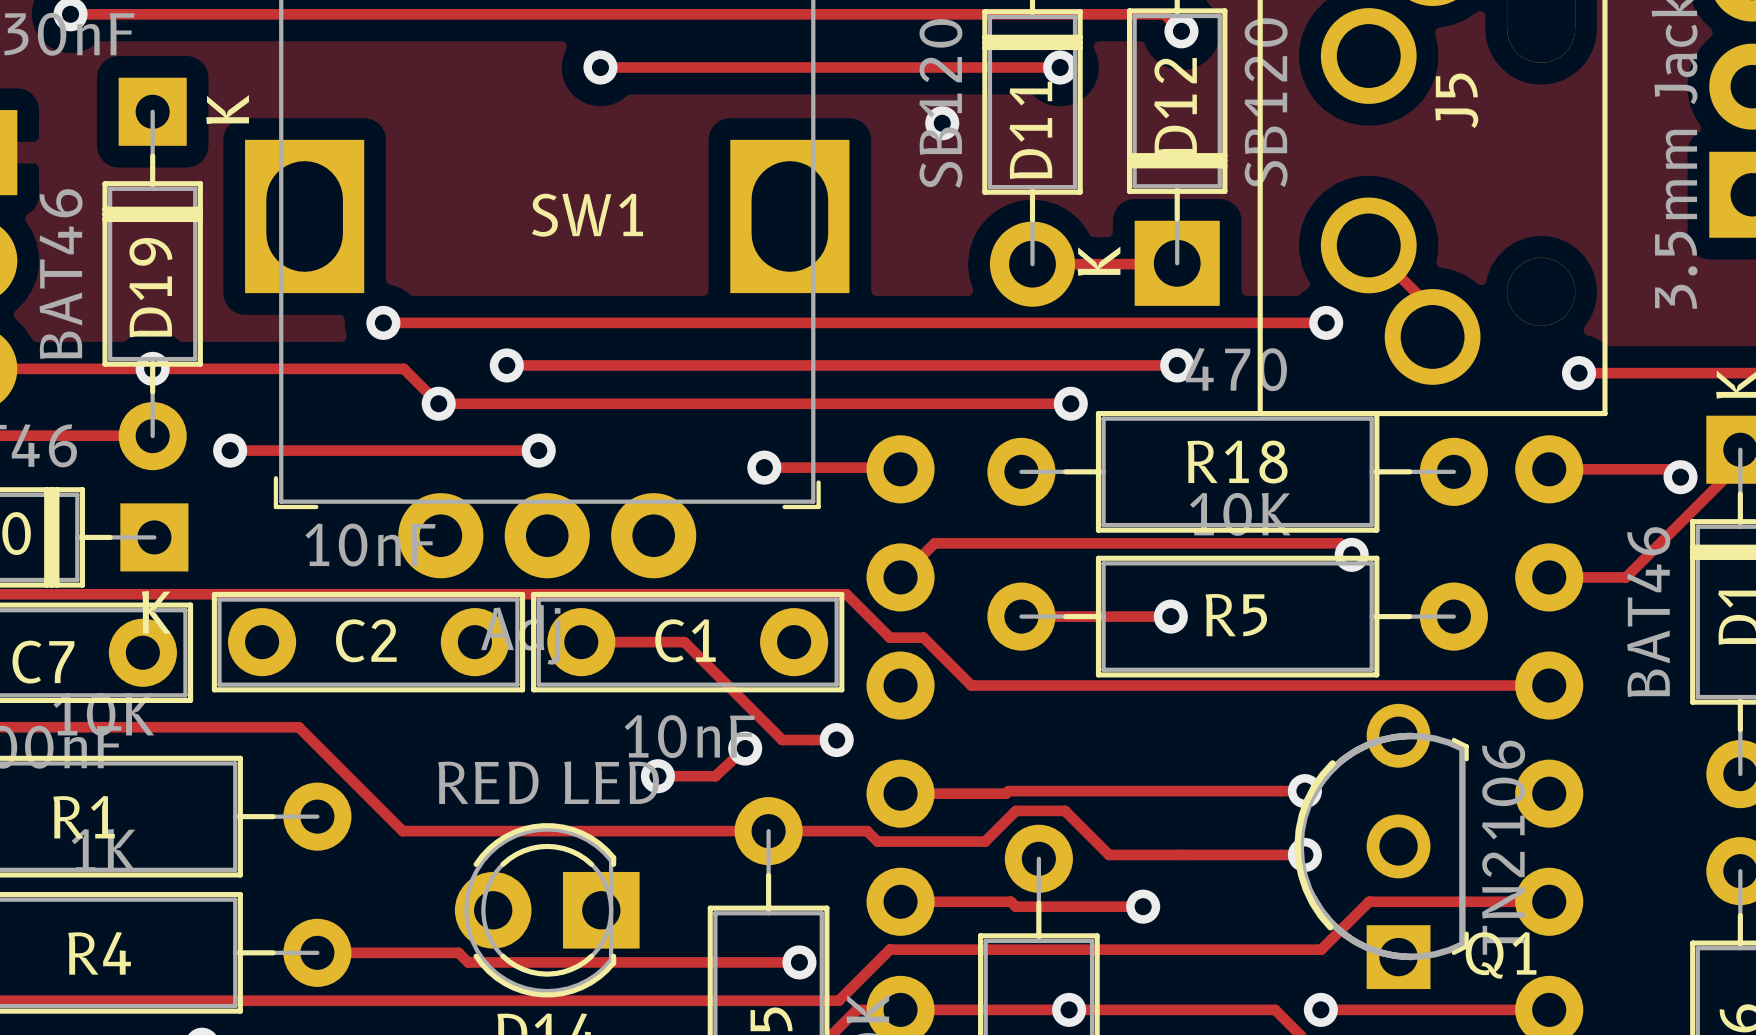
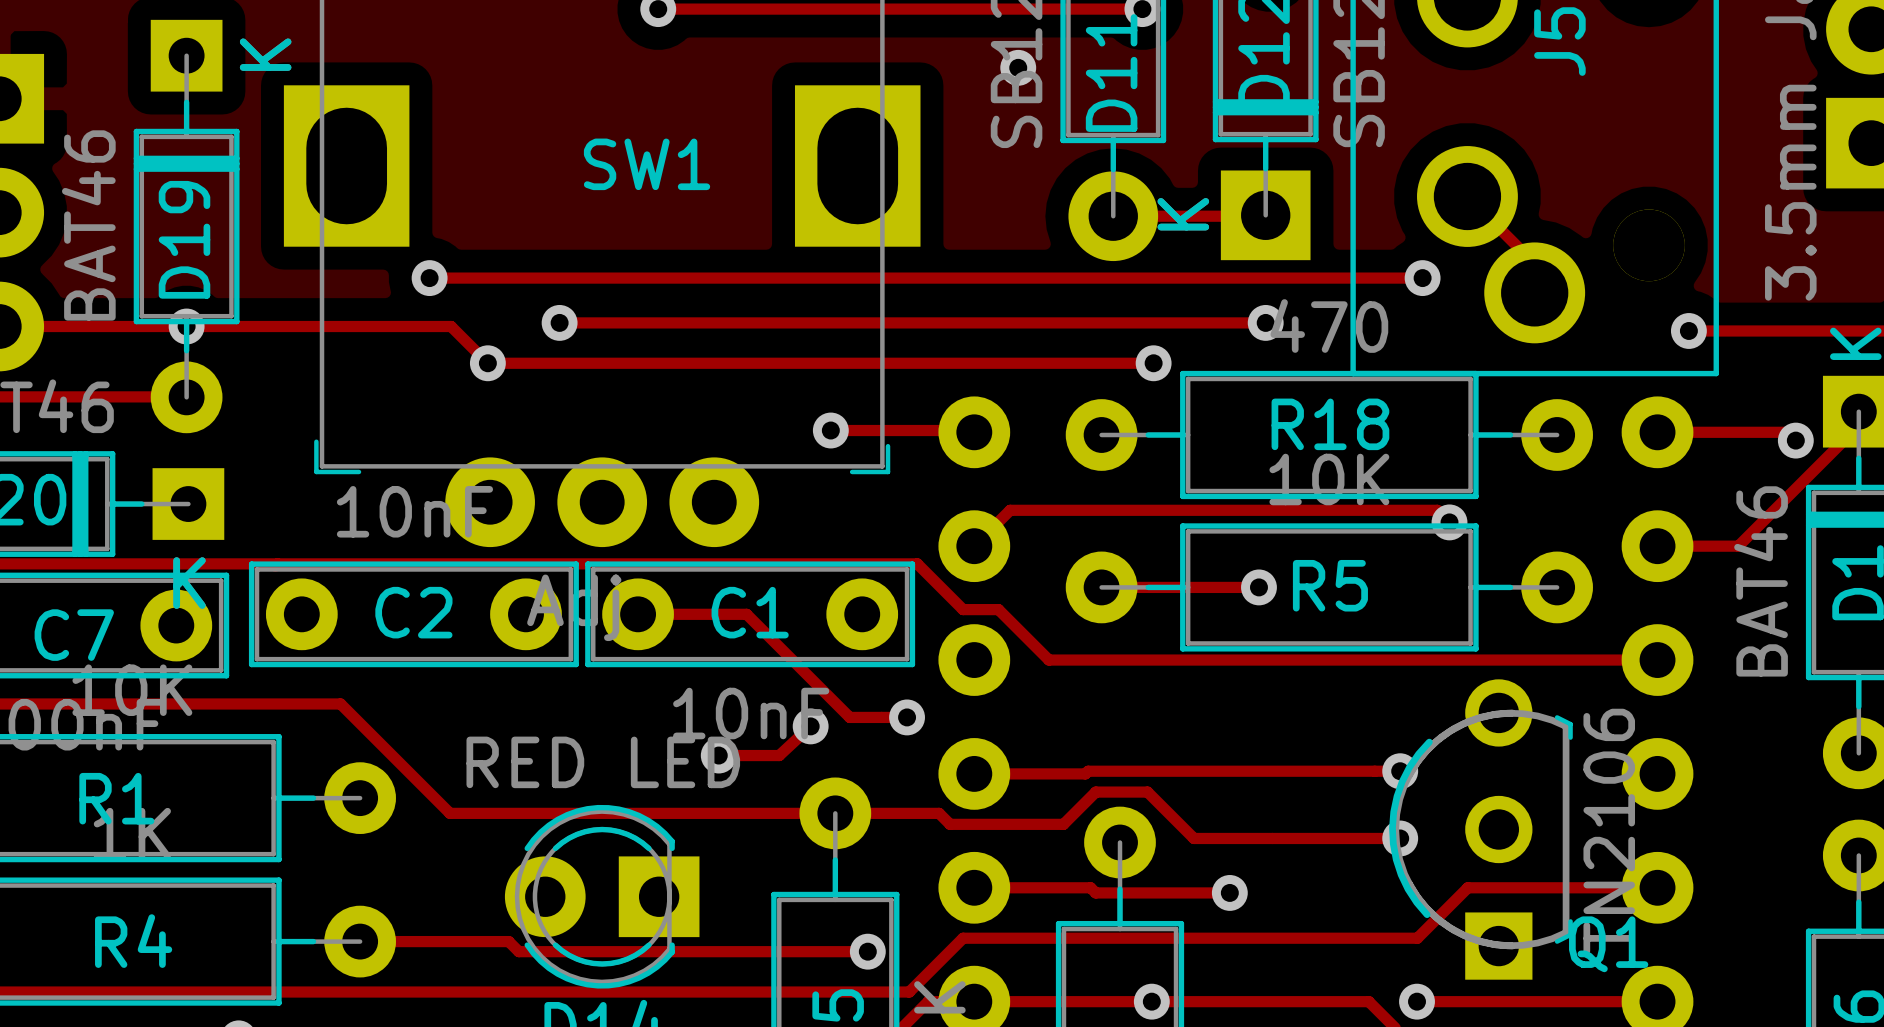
track: (230, 450) (538, 450) -> none
via: (230, 450) -> none
via: (538, 450) -> none

